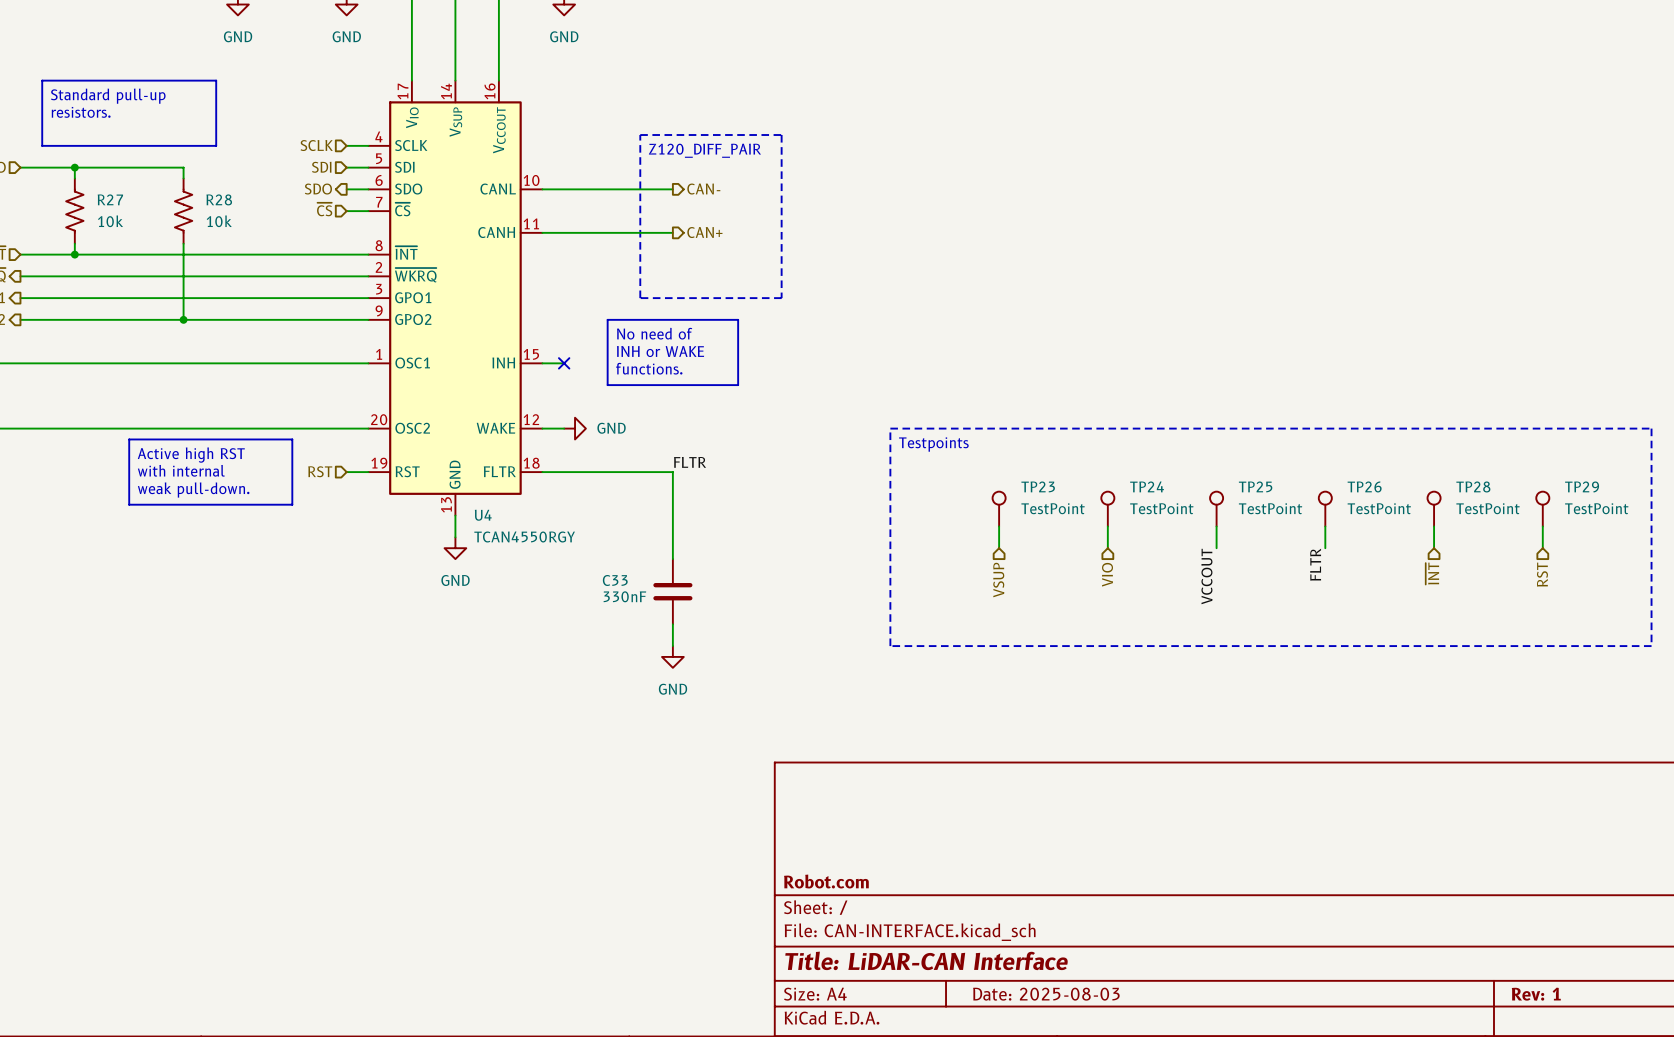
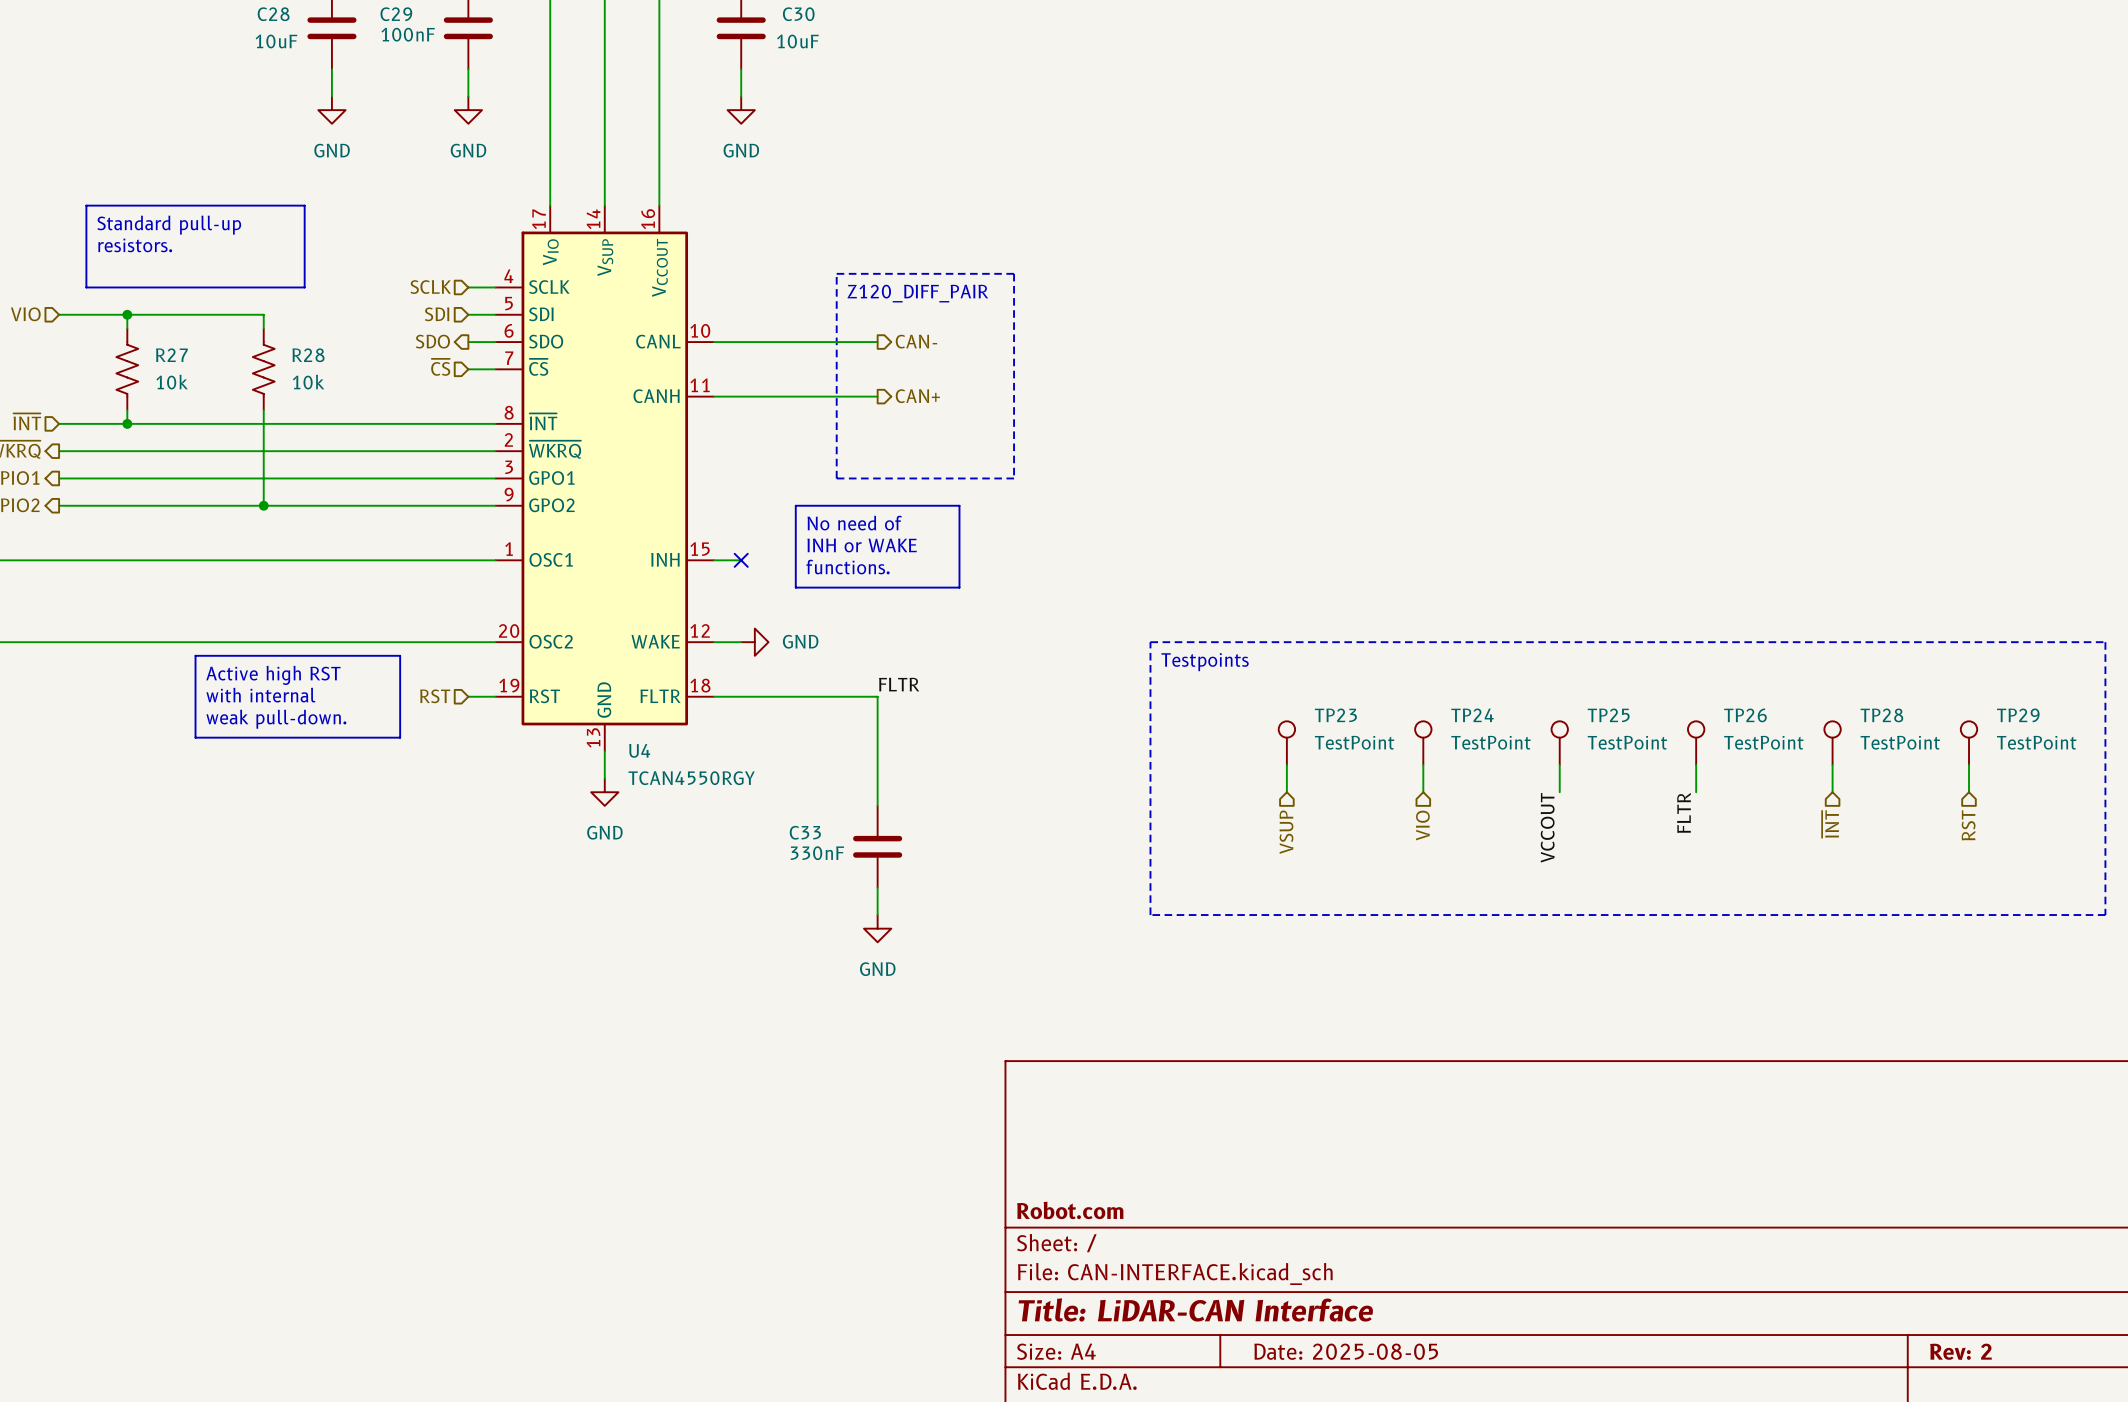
title block: Date: 2025-08-03 (1046, 994) -> Date: 2025-08-05 (1346, 1351)
title block: Rev: 1 (1536, 994) -> Rev: 2 (1960, 1351)

